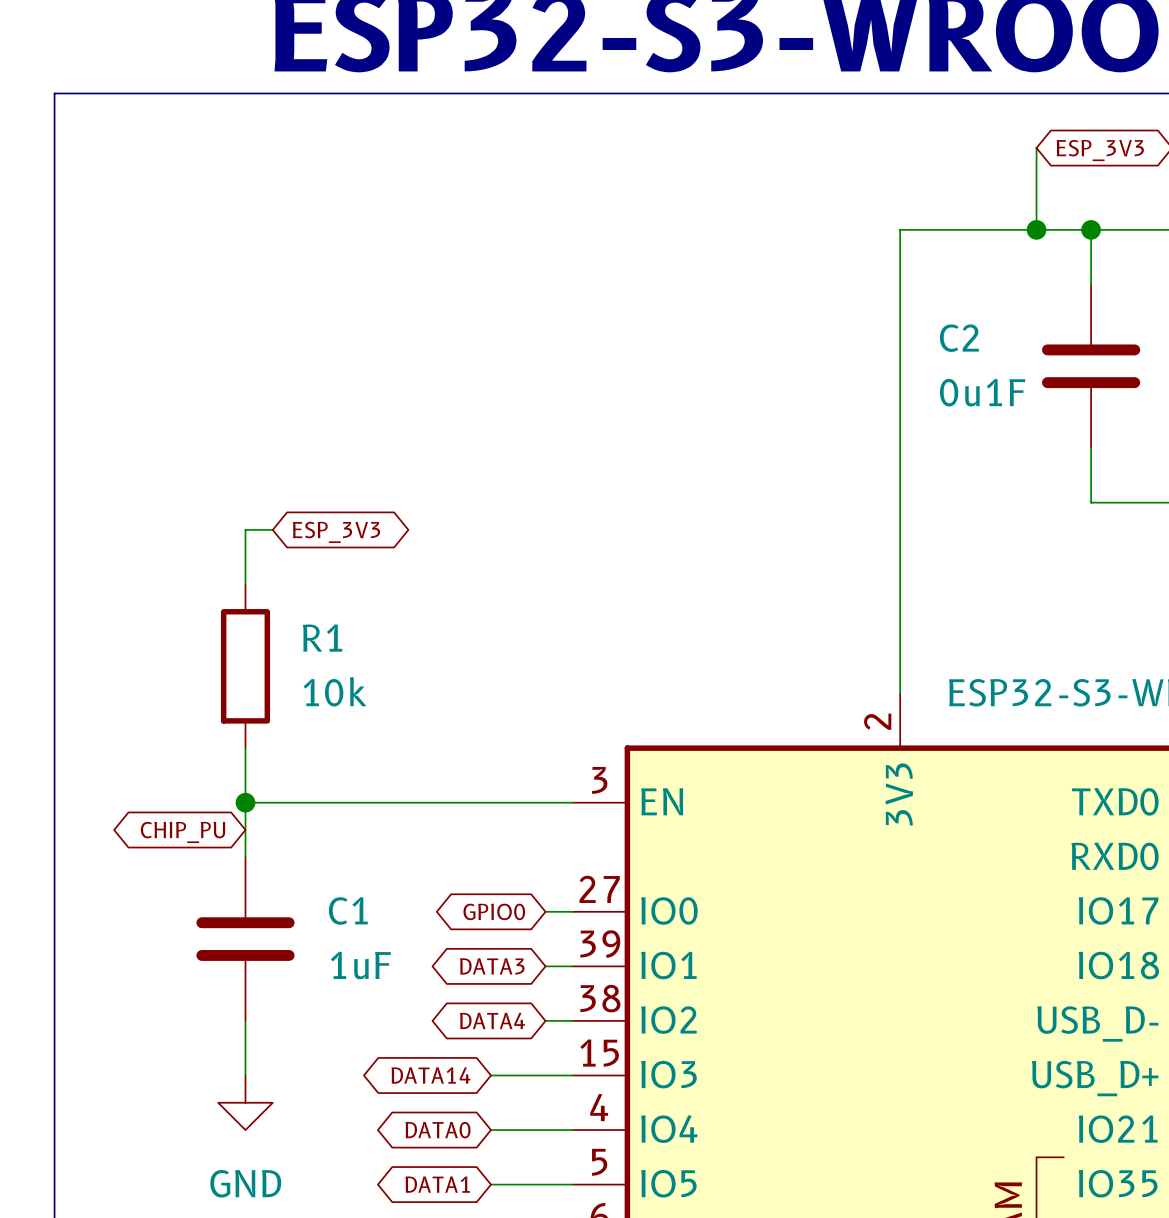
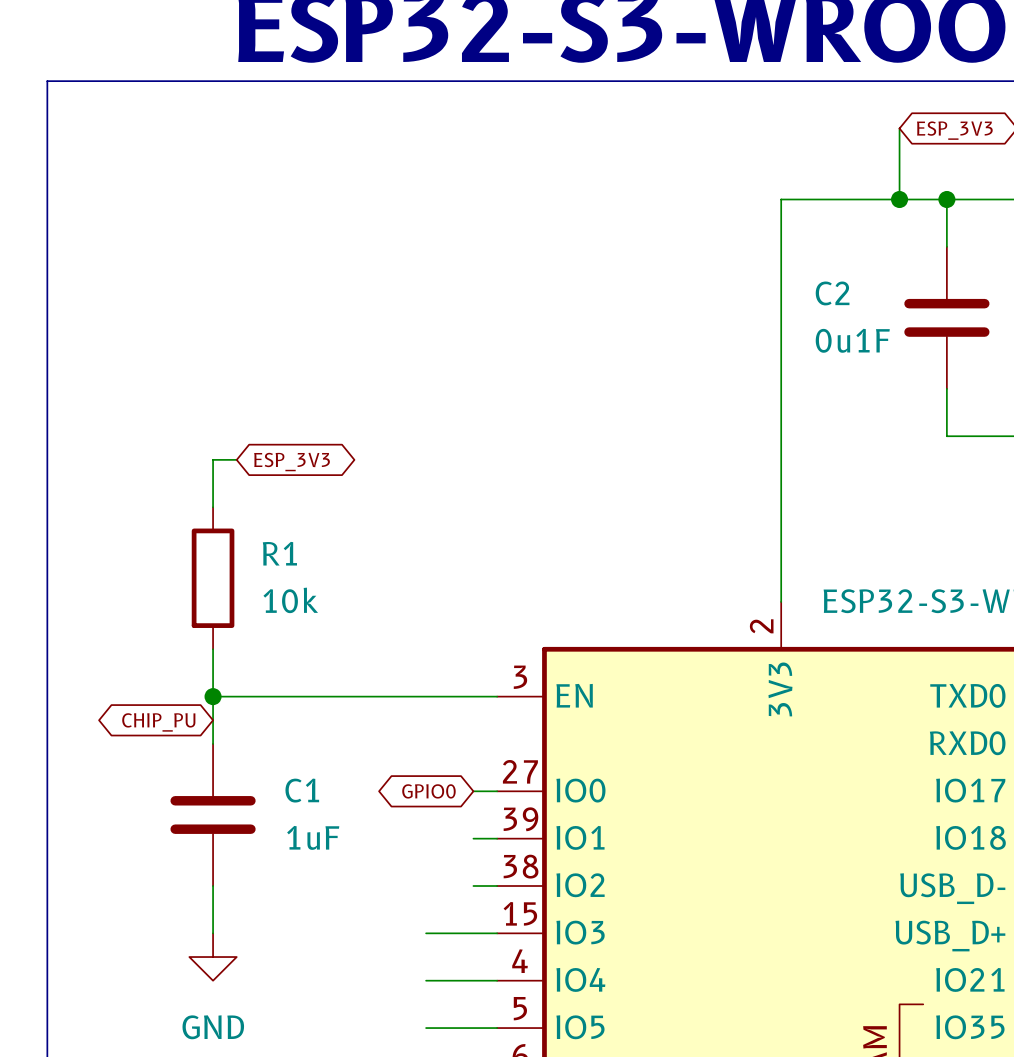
global label: DATA3 (492, 966) -> none
global label: DATA4 (492, 1020) -> none
global label: DATA14 (430, 1075) -> none
global label: DATA0 (438, 1130) -> none
global label: DATA1 (437, 1184) -> none

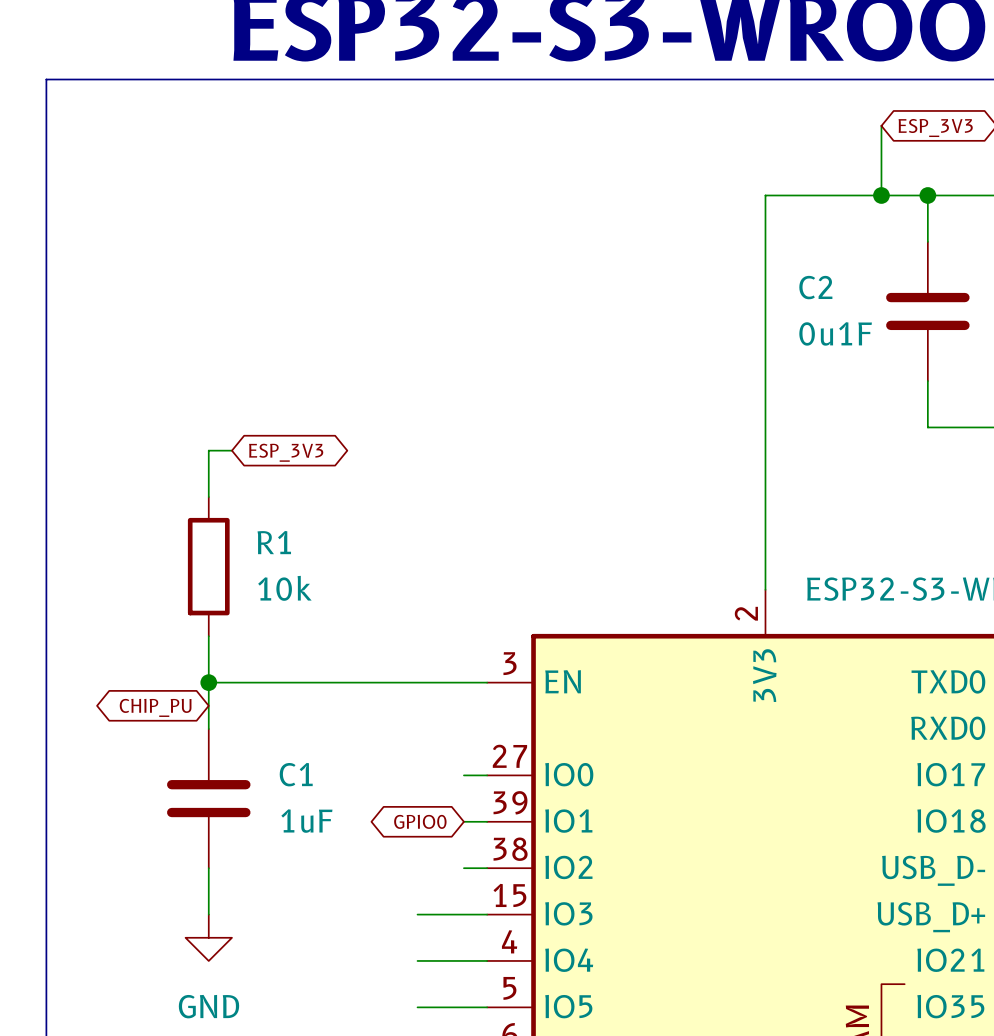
global label position: GPIO0 (428, 791) -> GPIO0 (420, 821)

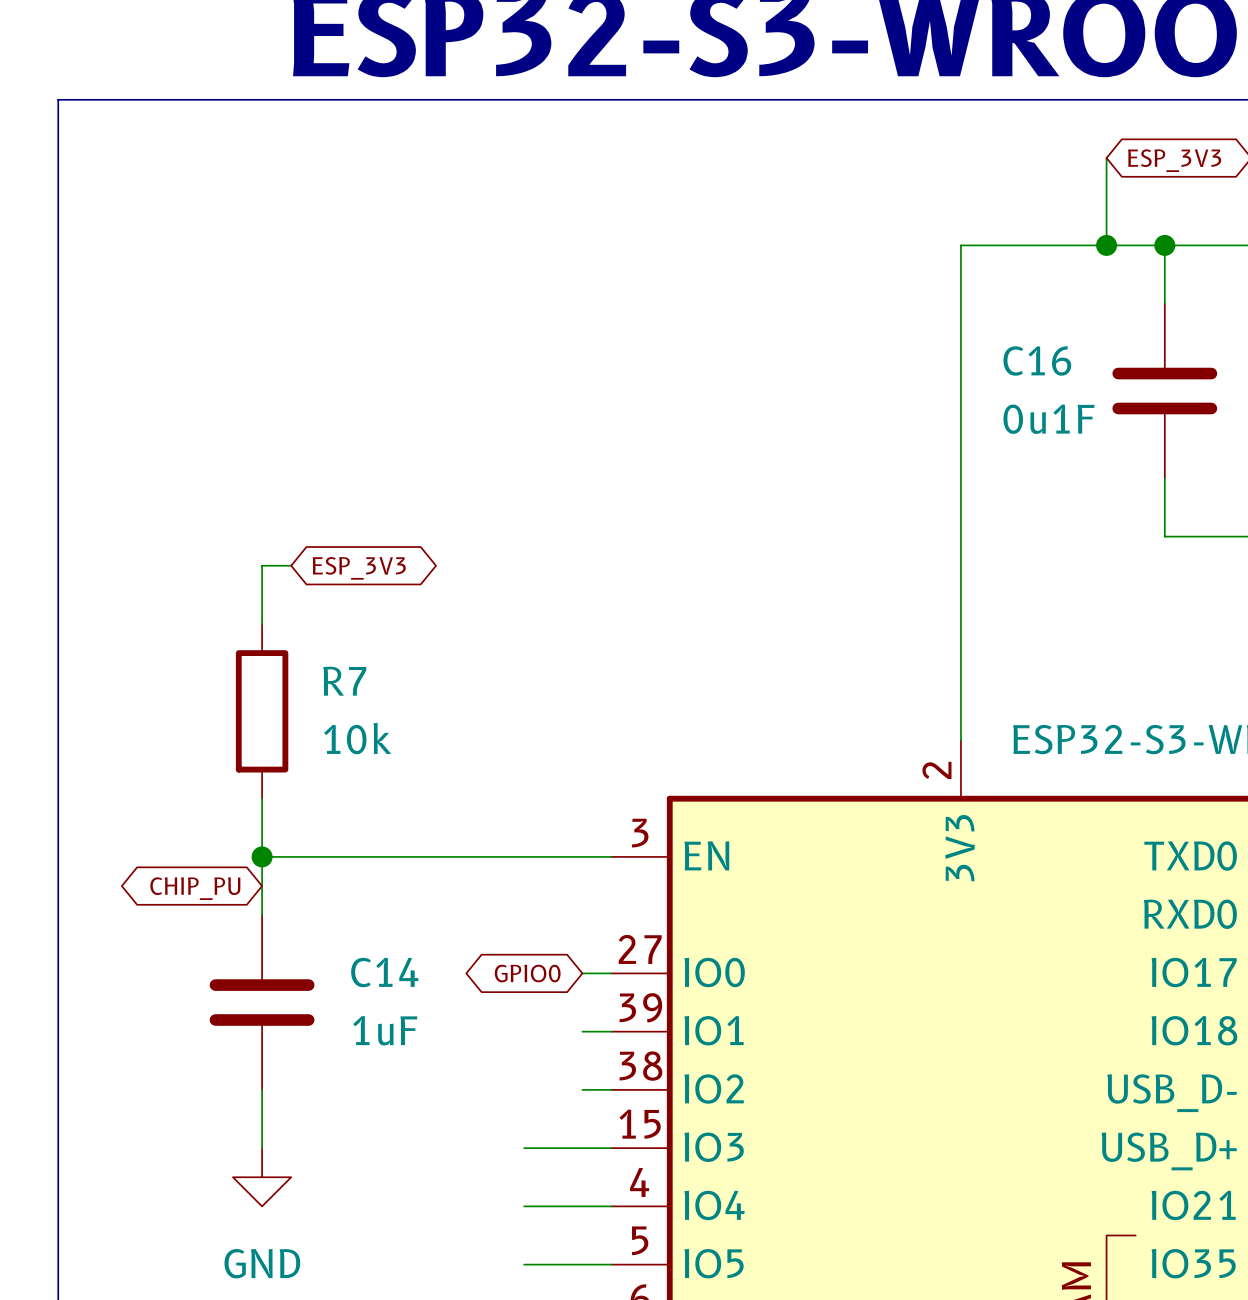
C2 name: C2 (815, 287) -> C16 (1037, 360)
R1 name: R1 (274, 542) -> R7 (344, 681)
C1 name: C1 (296, 774) -> C14 (384, 972)
global label position: GPIO0 (420, 821) -> GPIO0 (527, 973)

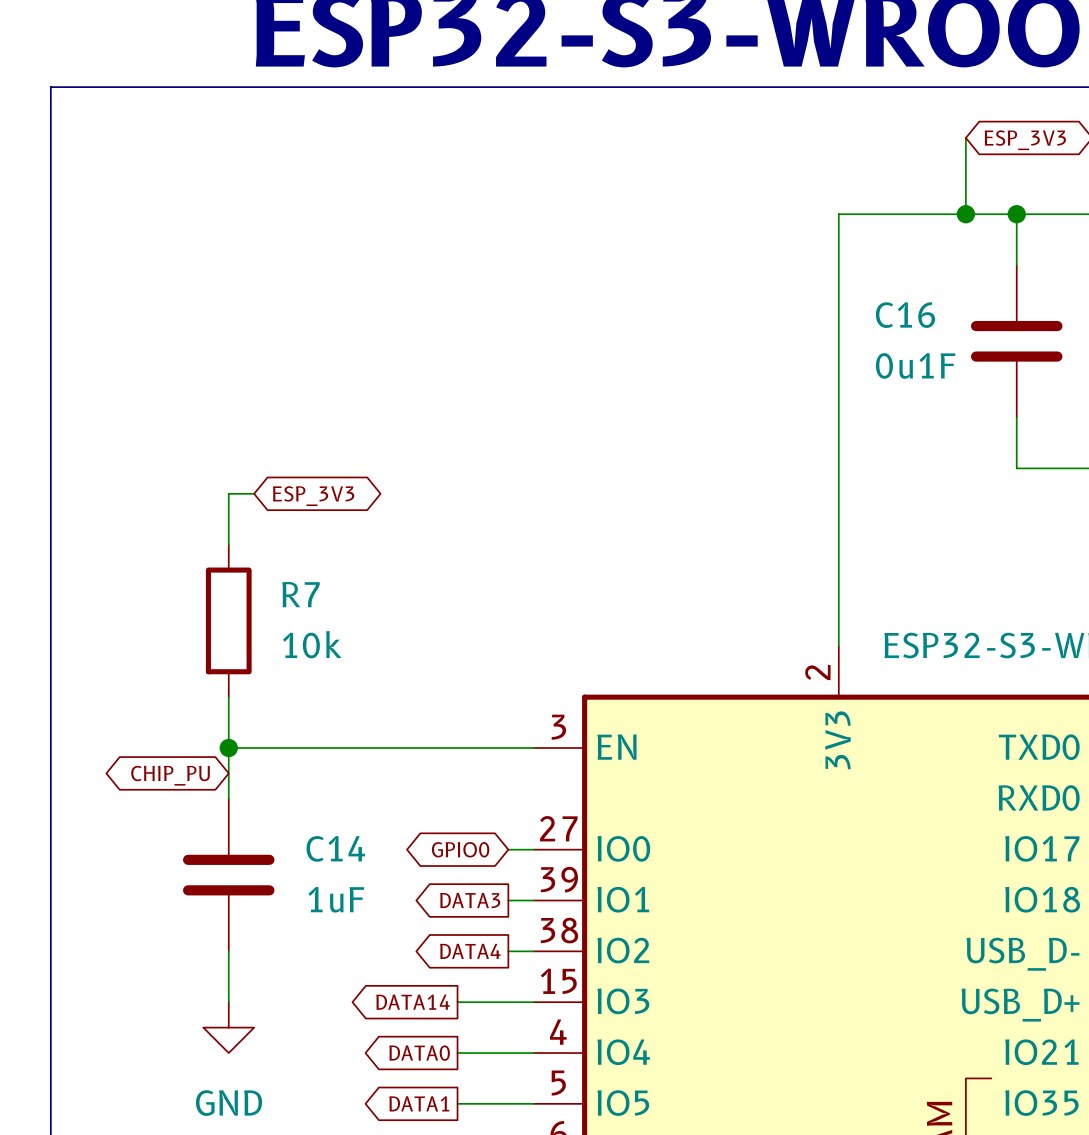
global label: none -> DATA3 (470, 900)
global label: none -> DATA4 (470, 951)
global label: none -> DATA14 (413, 1002)
global label: none -> DATA0 (419, 1053)
global label: none -> DATA1 (419, 1103)

